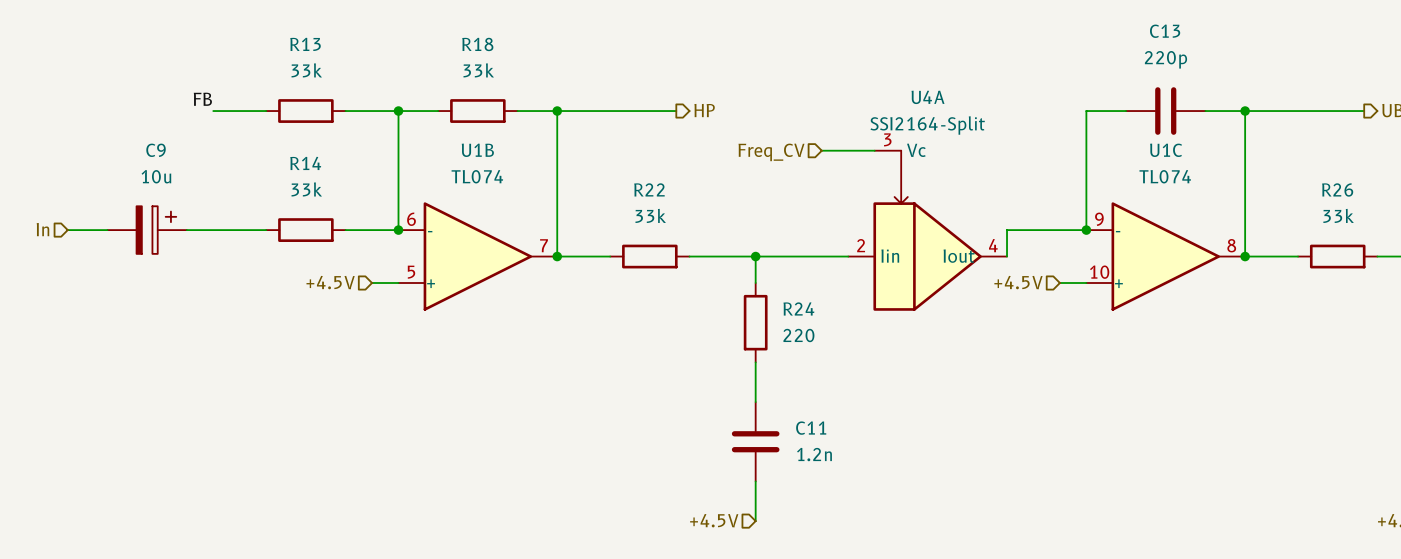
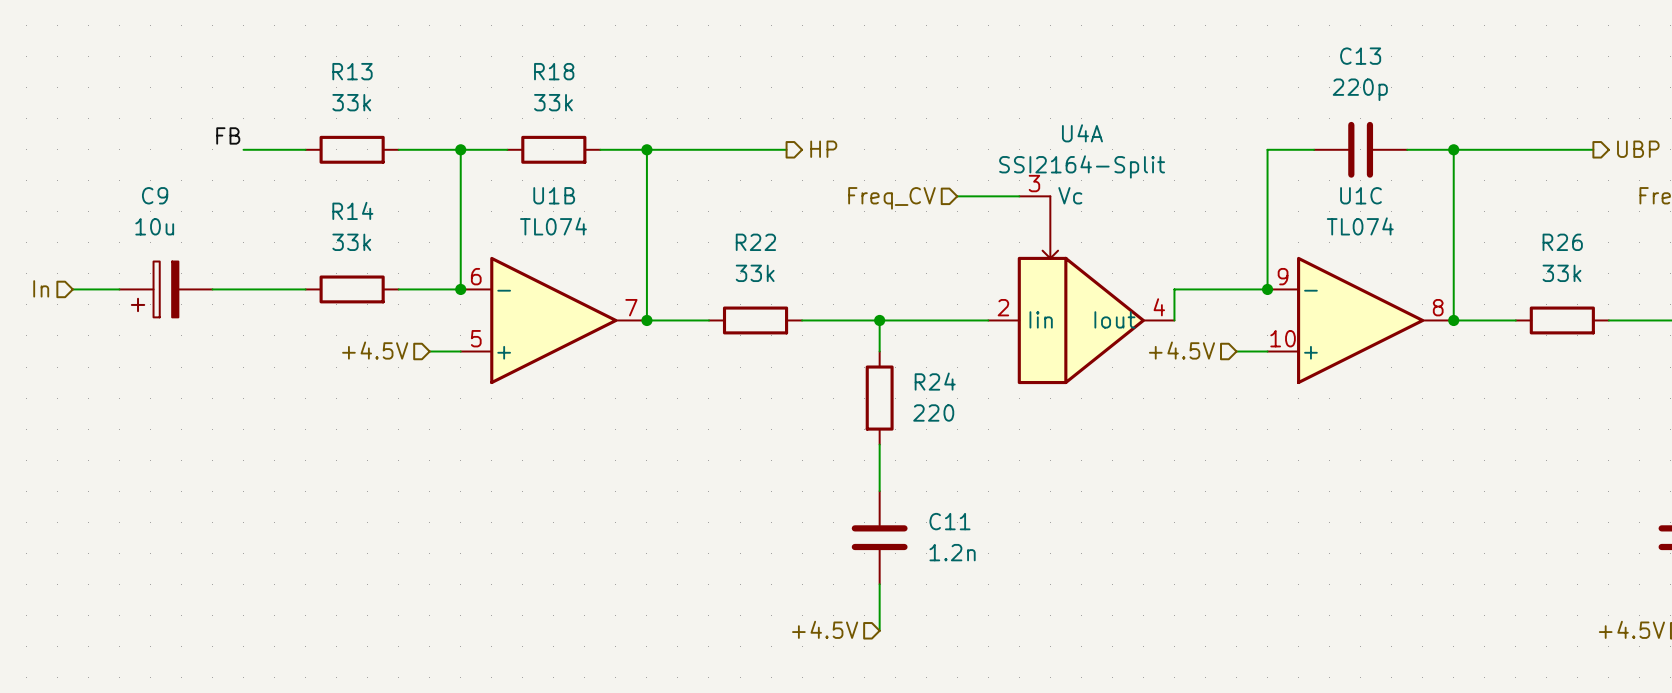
C9 rotation: 0° (156, 230) -> 180° (155, 289)

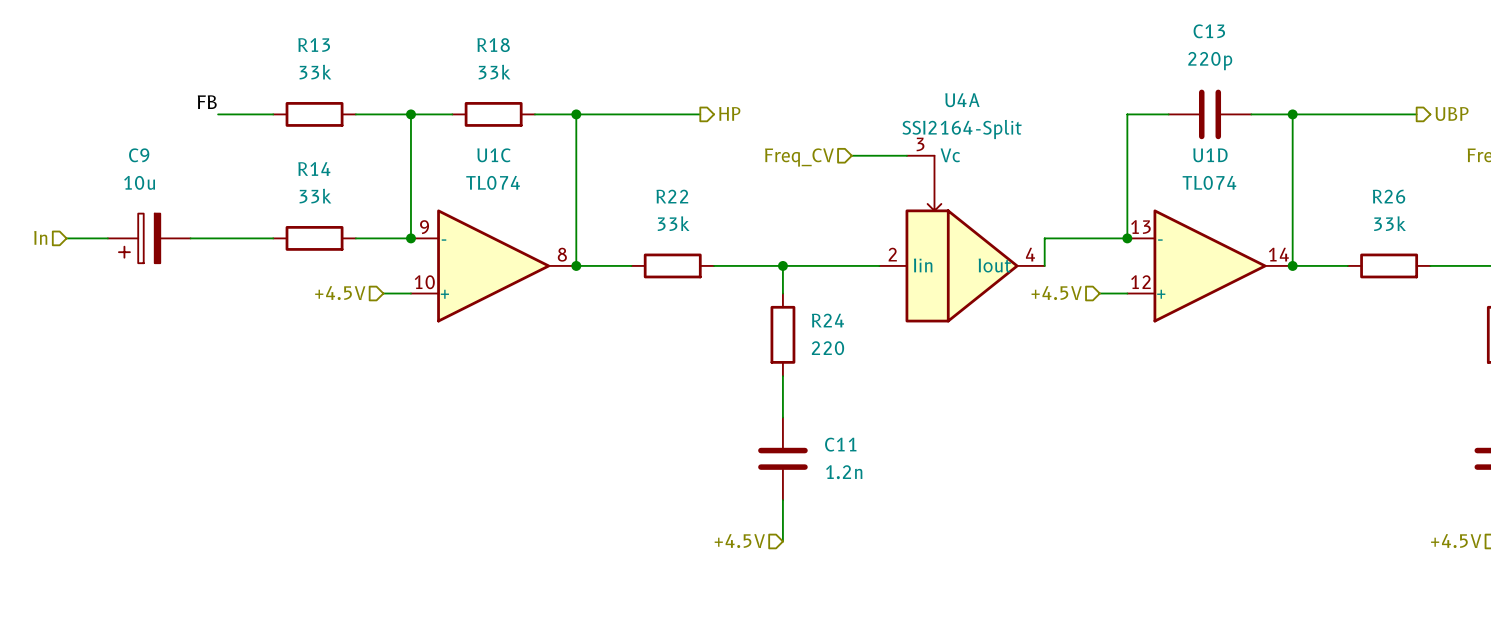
U1B: TL074 (553, 320) -> none
U1C position: (1360, 320) -> (493, 265)
U1D: none -> TL074 (1210, 265)

